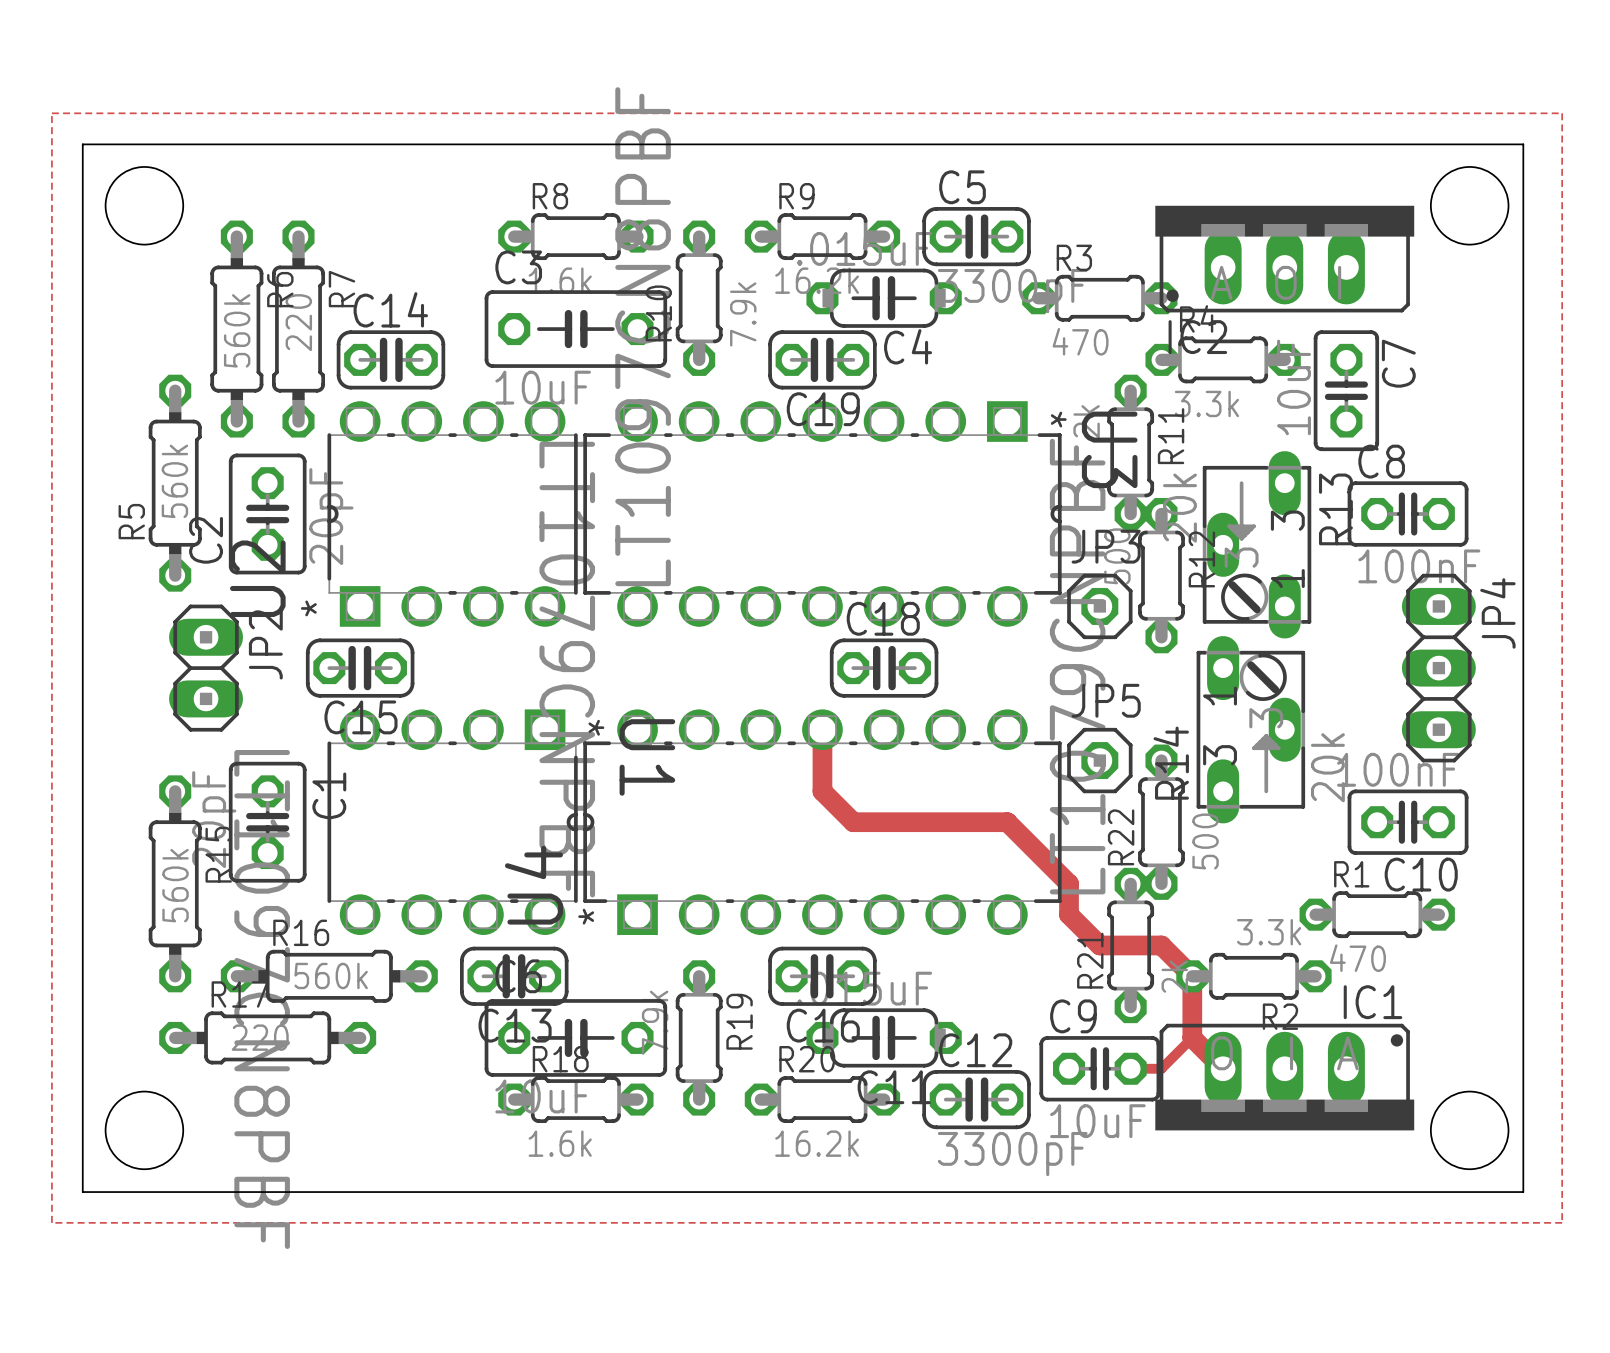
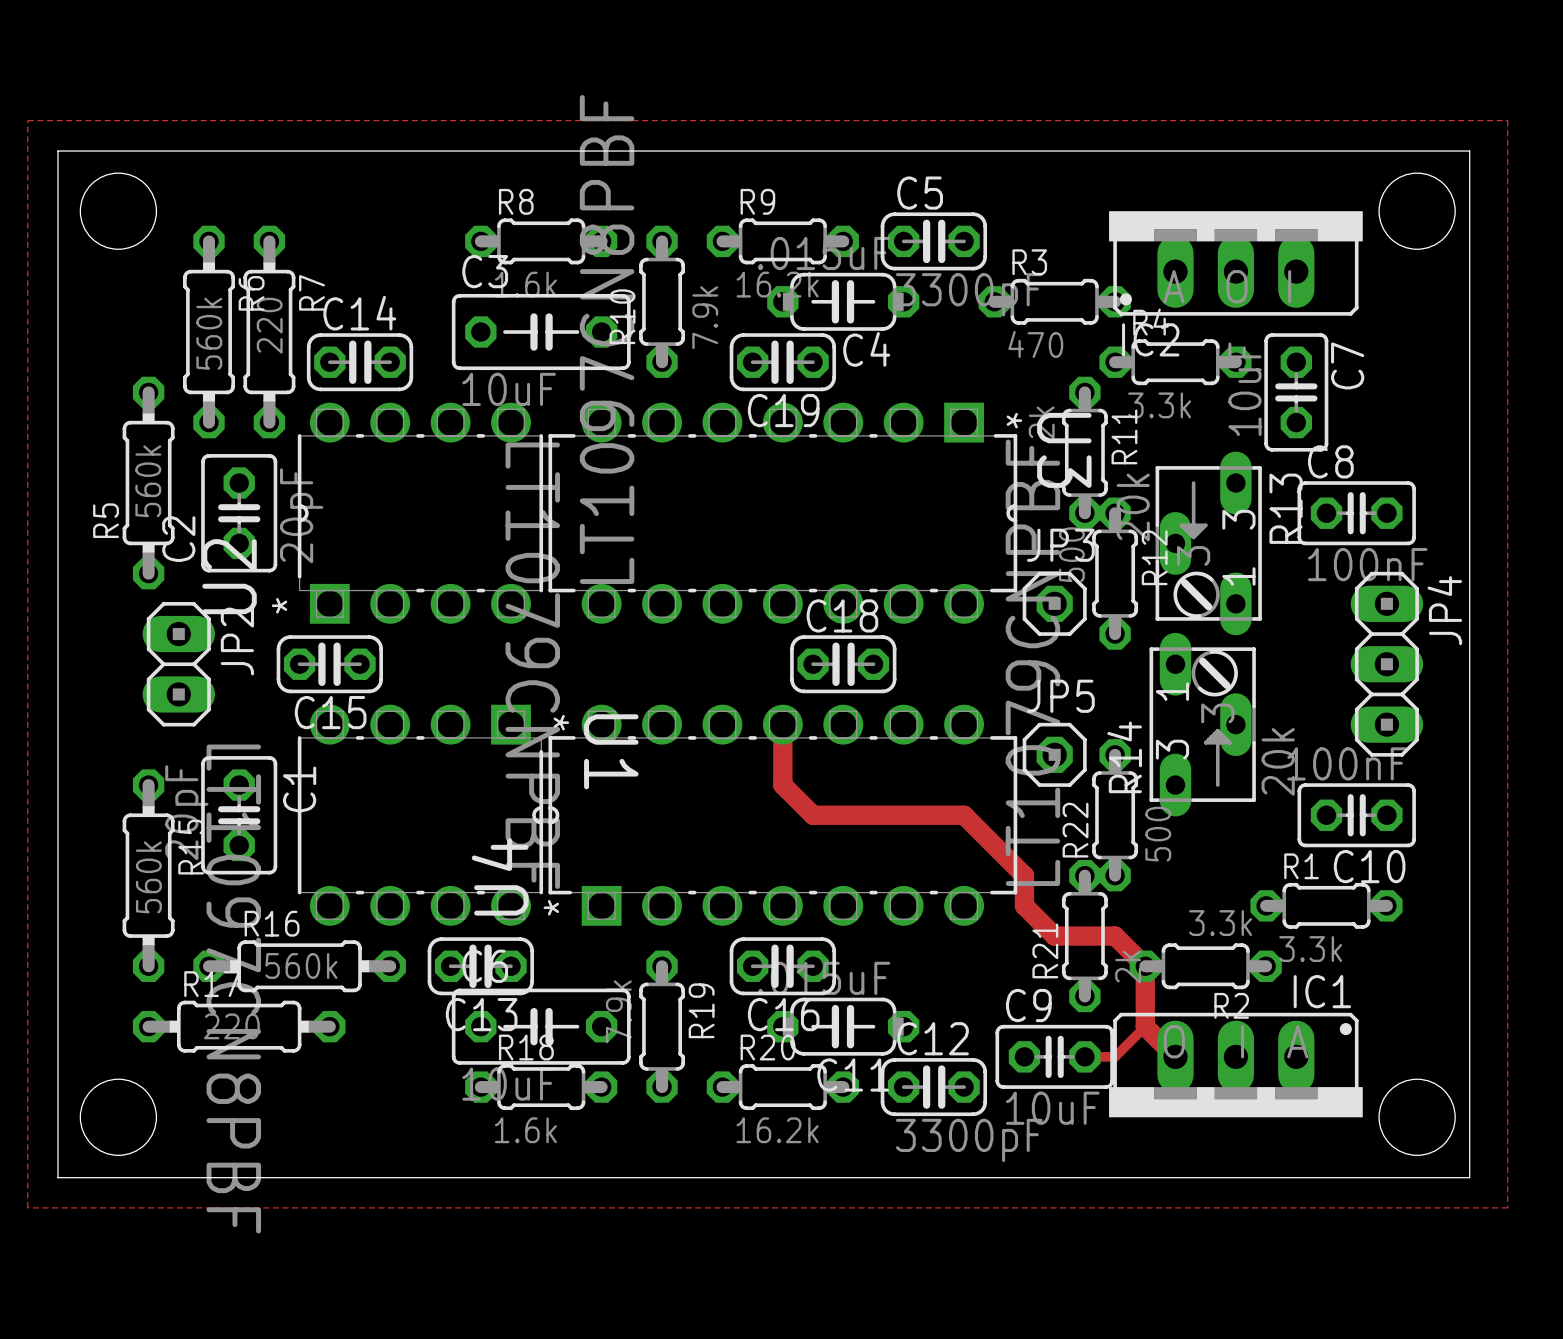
R1 value: 470 (1357, 958) -> 3.3k (1310, 949)

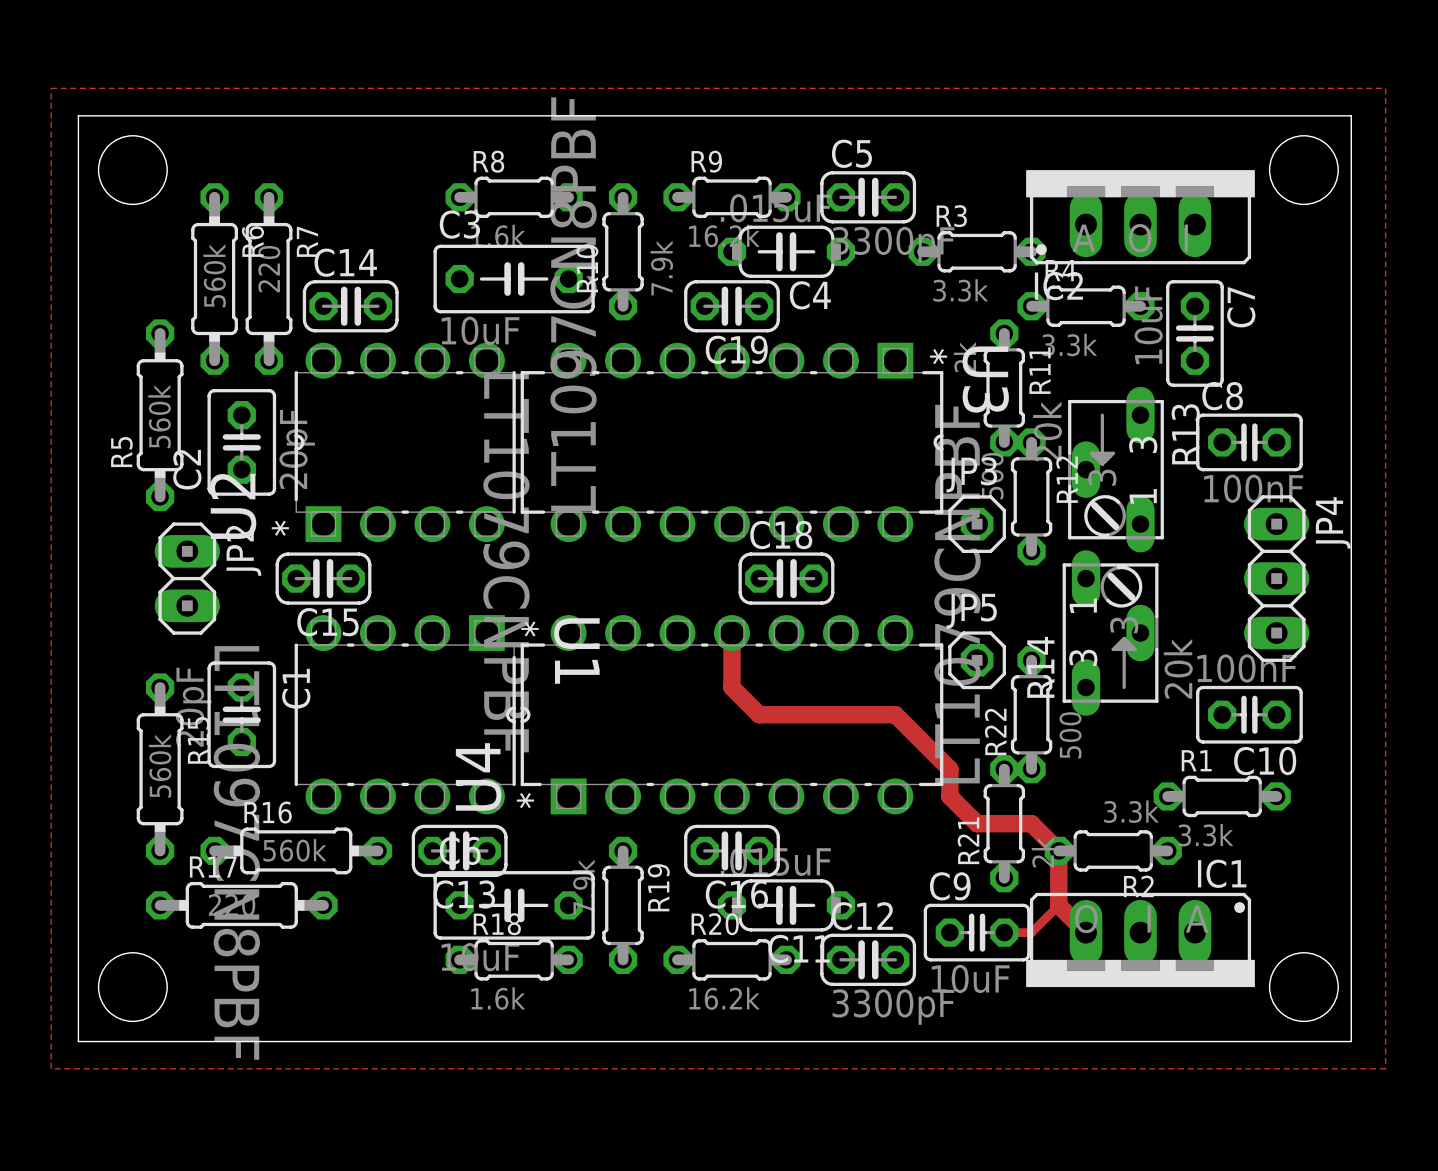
R3 value: 470 (1035, 344) -> 3.3k (960, 290)

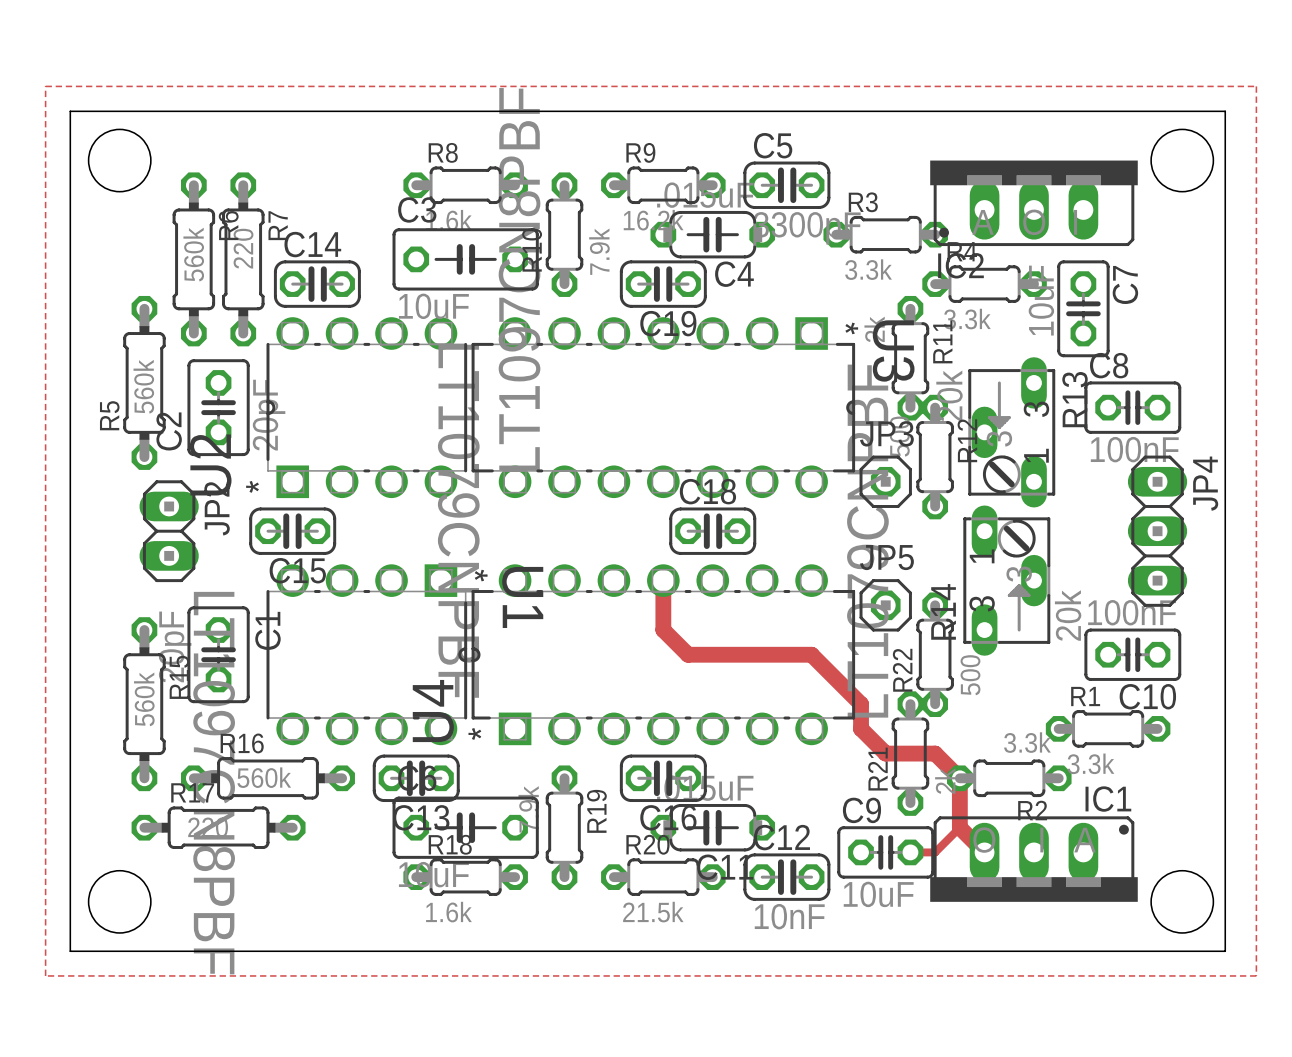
R20 value: 16.2k (724, 998) -> 21.5k (653, 912)
C12 value: 3300pF (893, 1007) -> 10nF (789, 916)

